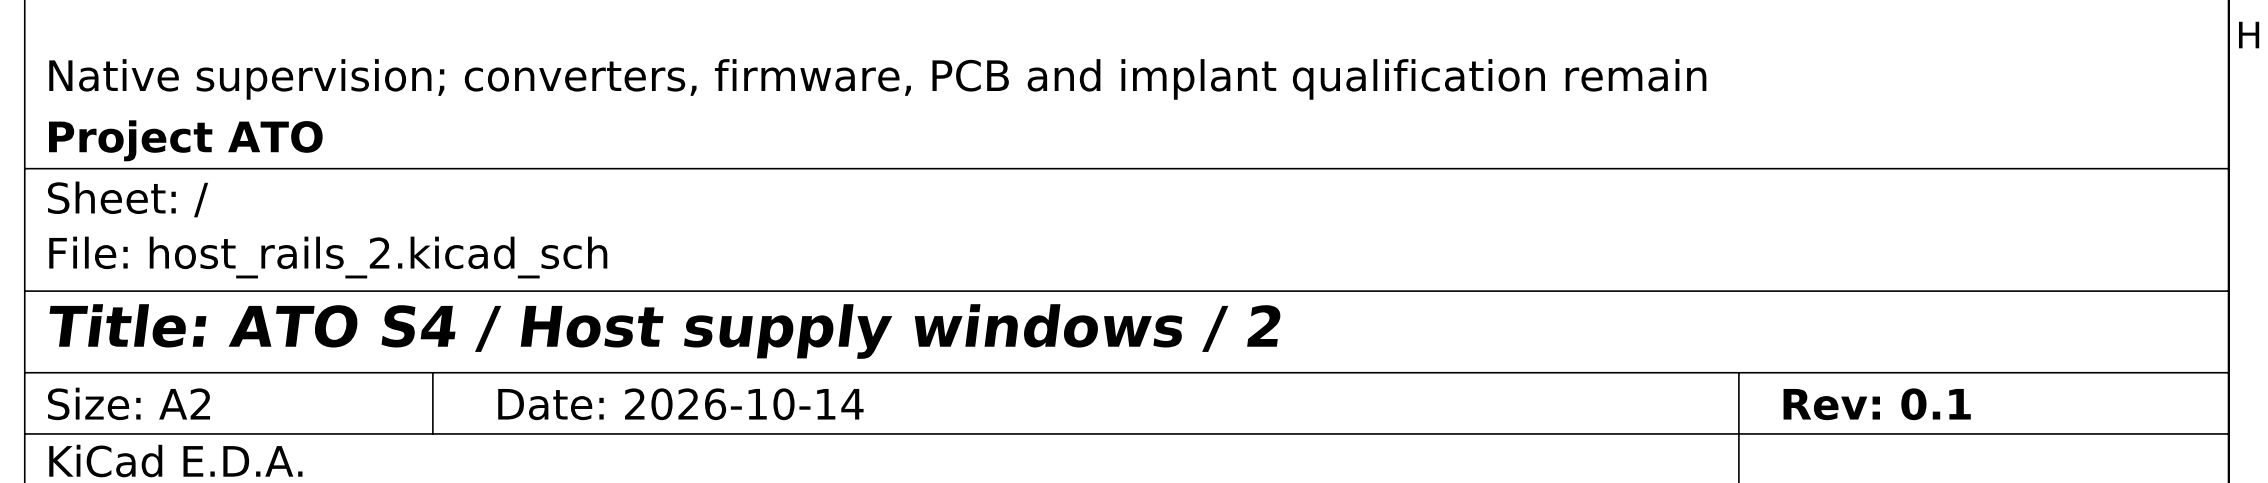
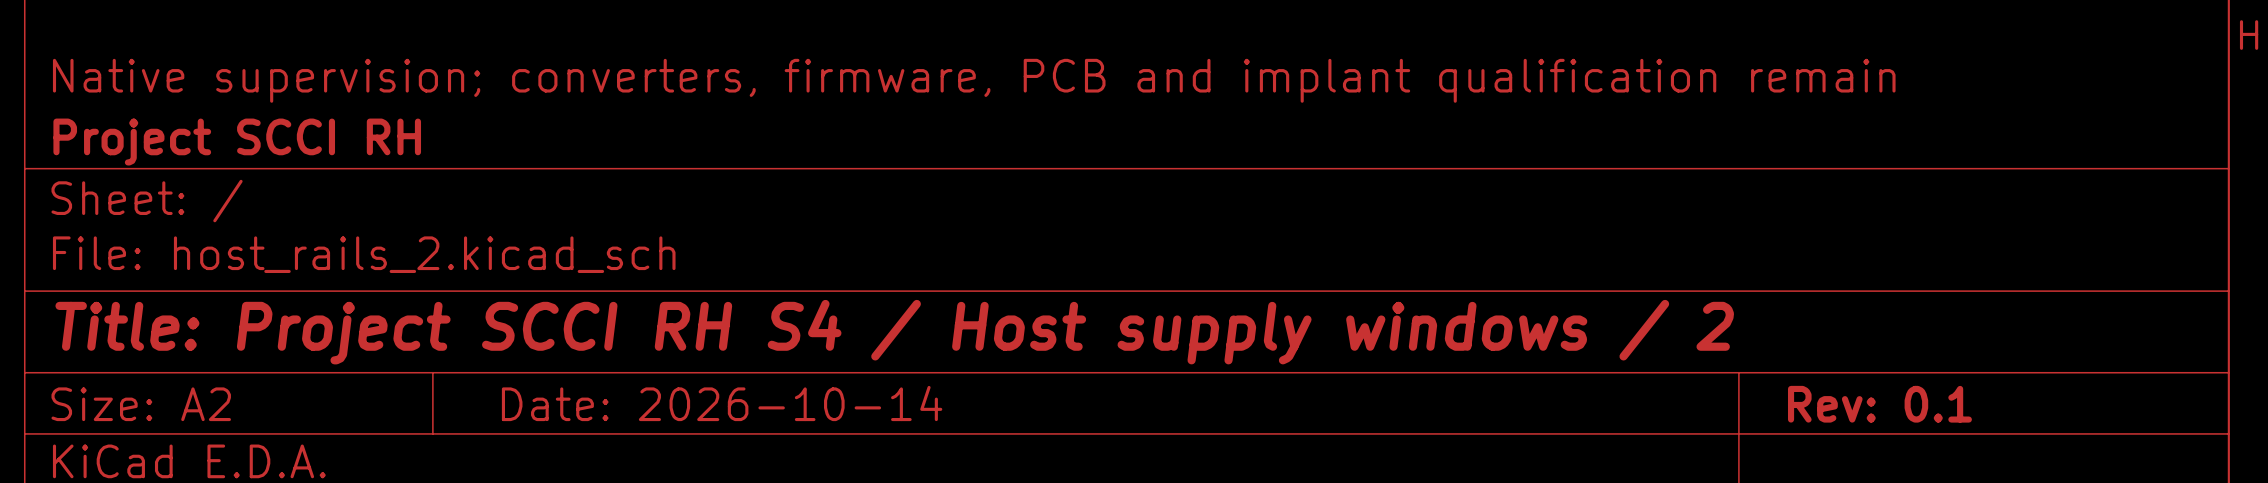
title block: Project ATO (185, 140) -> Project SCCI RH (237, 142)
title block: Title: ATO S4 / Host supply windows / 2 (665, 331) -> Title: Project SCCI RH S4 / Host supply windows / 2 (894, 332)

